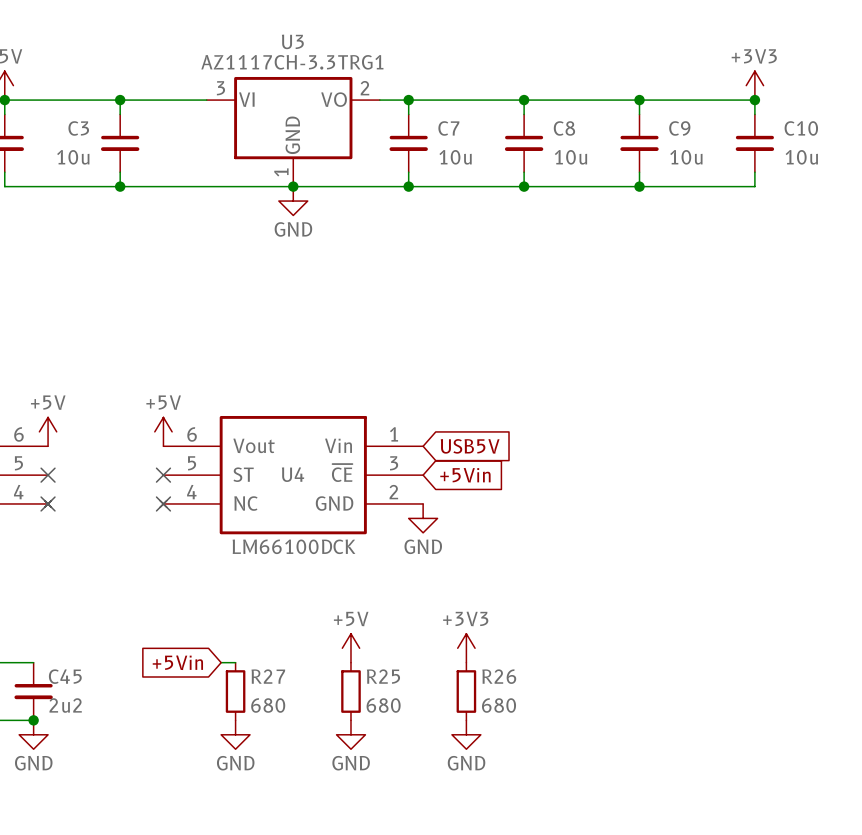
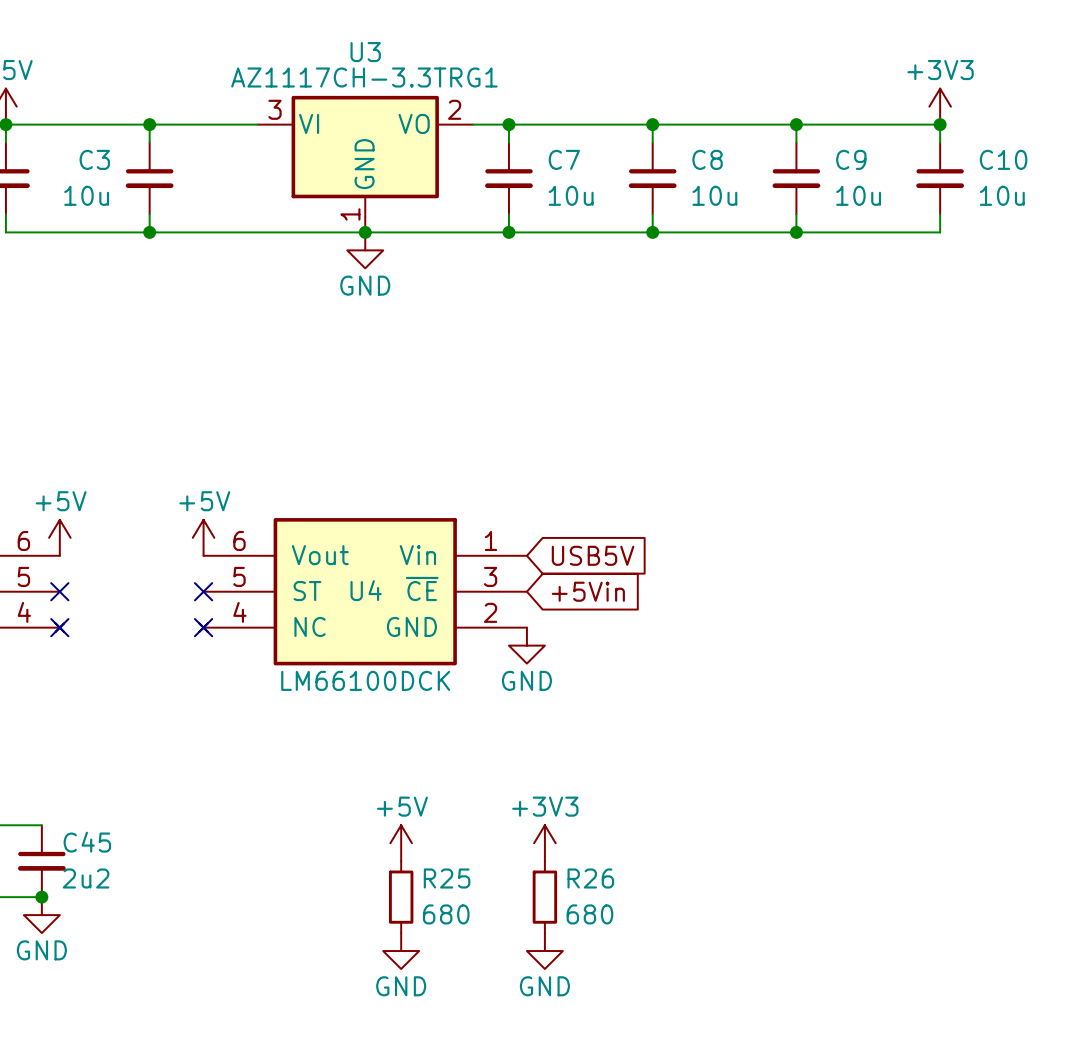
power symbol position: +5V (350, 648) -> +5V (401, 843)
power symbol position: +3V3 (466, 648) -> +3V3 (544, 843)
global label: +5Vin (177, 662) -> none
wire: (221, 662) (235, 662) -> none
R27: 680 (235, 691) -> none
R25 position: (350, 691) -> (401, 897)
R26 position: (466, 691) -> (544, 897)
power symbol: GND (235, 734) -> none
power symbol position: GND (350, 734) -> GND (401, 951)
power symbol position: GND (466, 734) -> GND (544, 951)

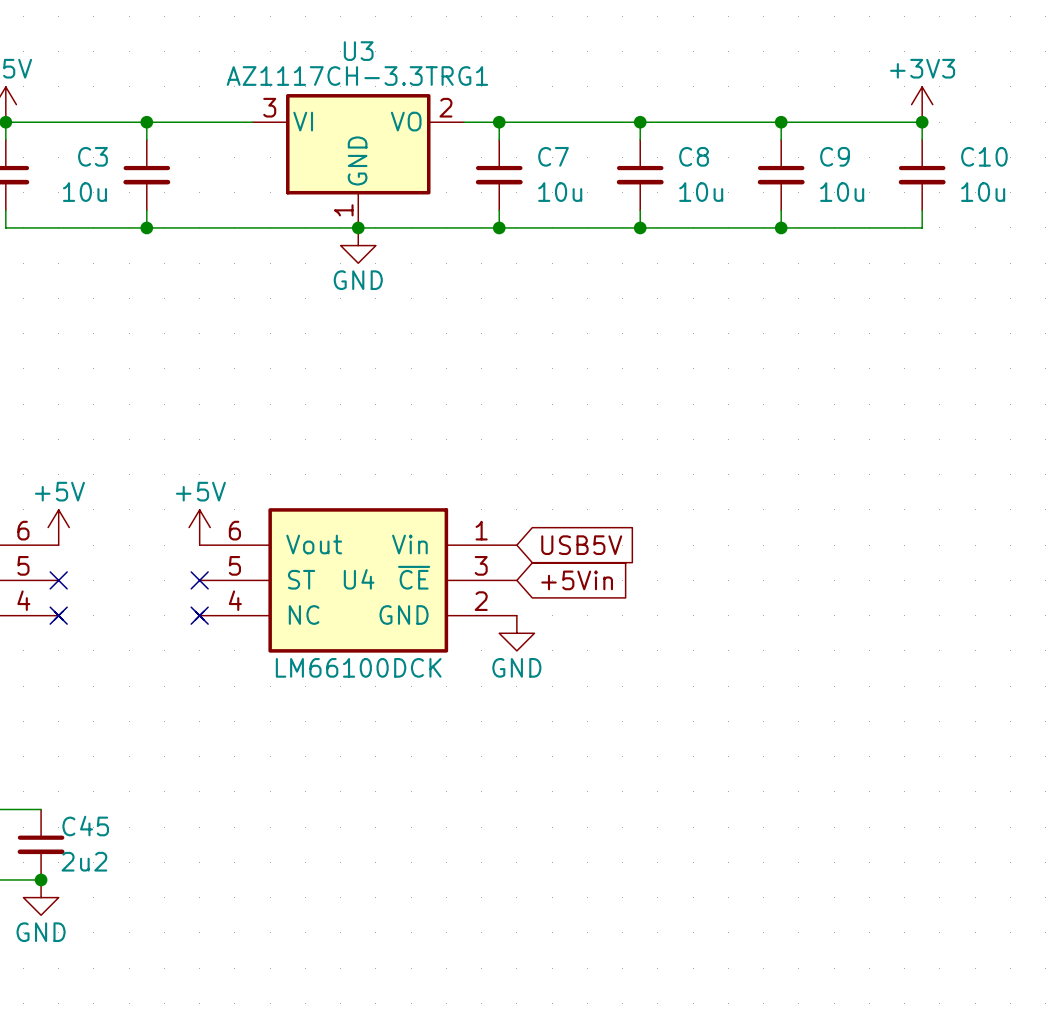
power symbol: +5V (401, 843) -> none
power symbol: +3V3 (544, 843) -> none
R25: 680 (401, 897) -> none
R26: 680 (544, 897) -> none
power symbol: GND (401, 951) -> none
power symbol: GND (544, 951) -> none

